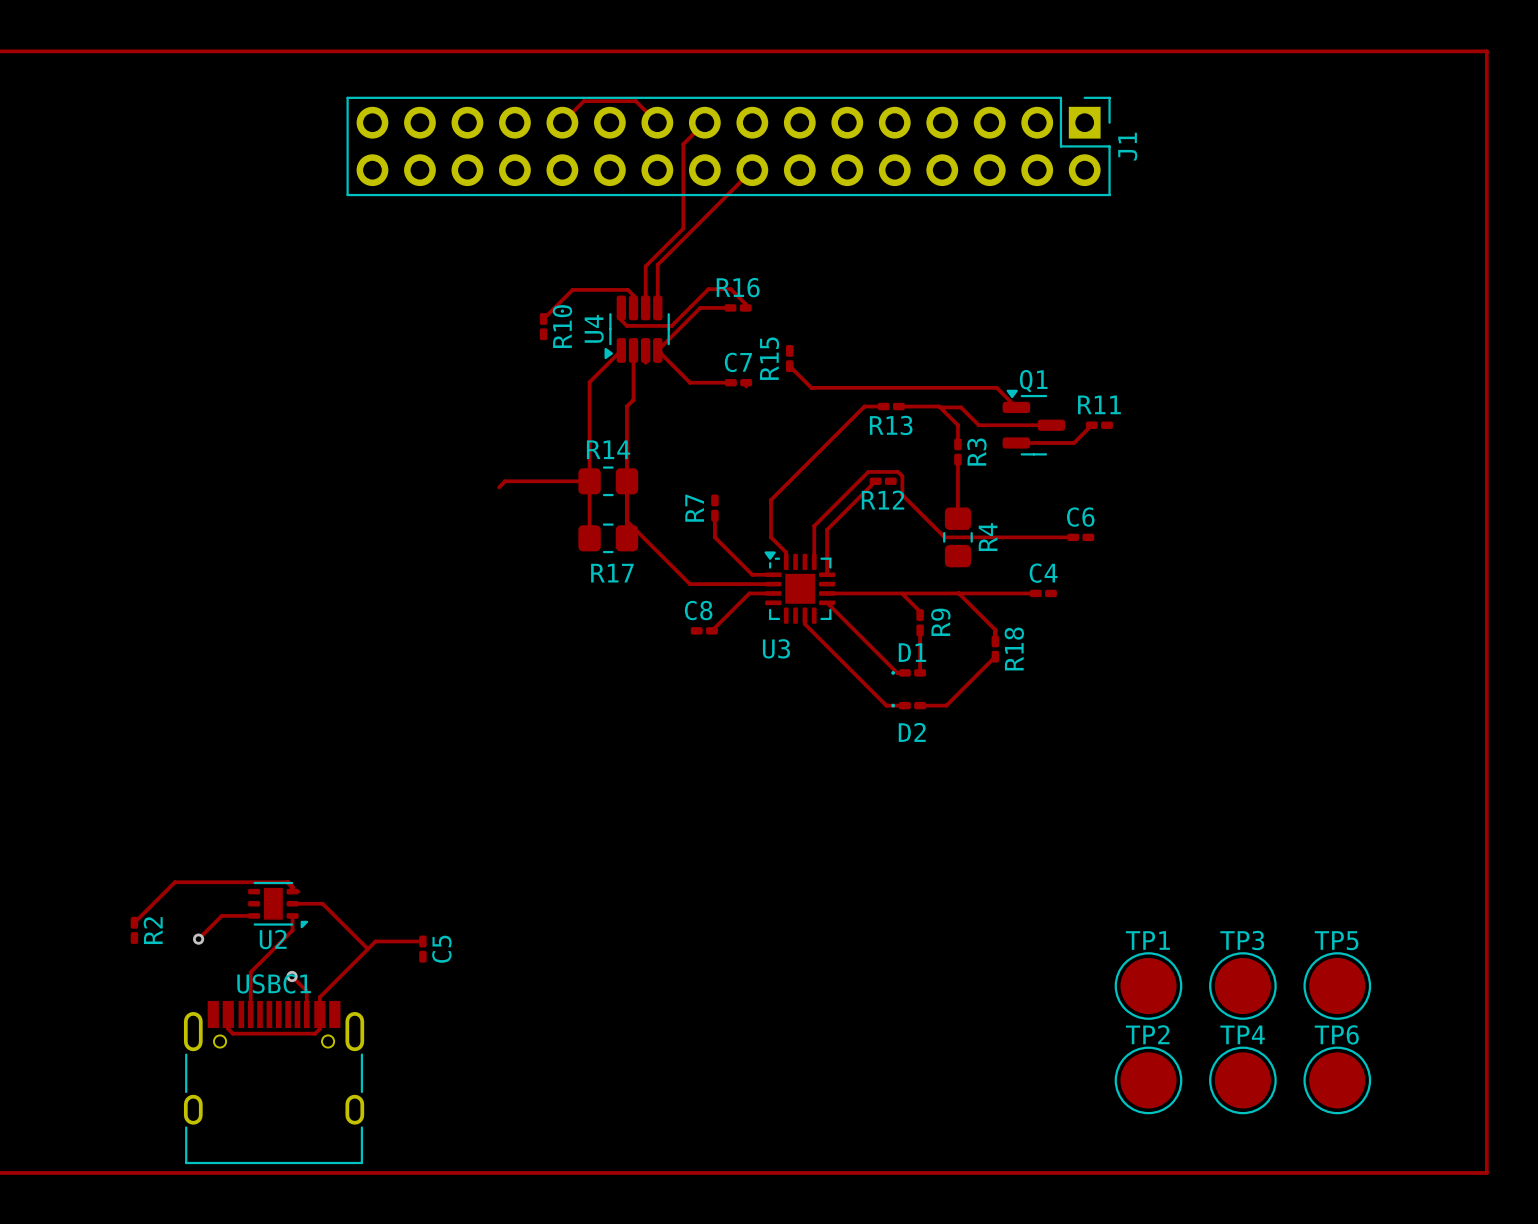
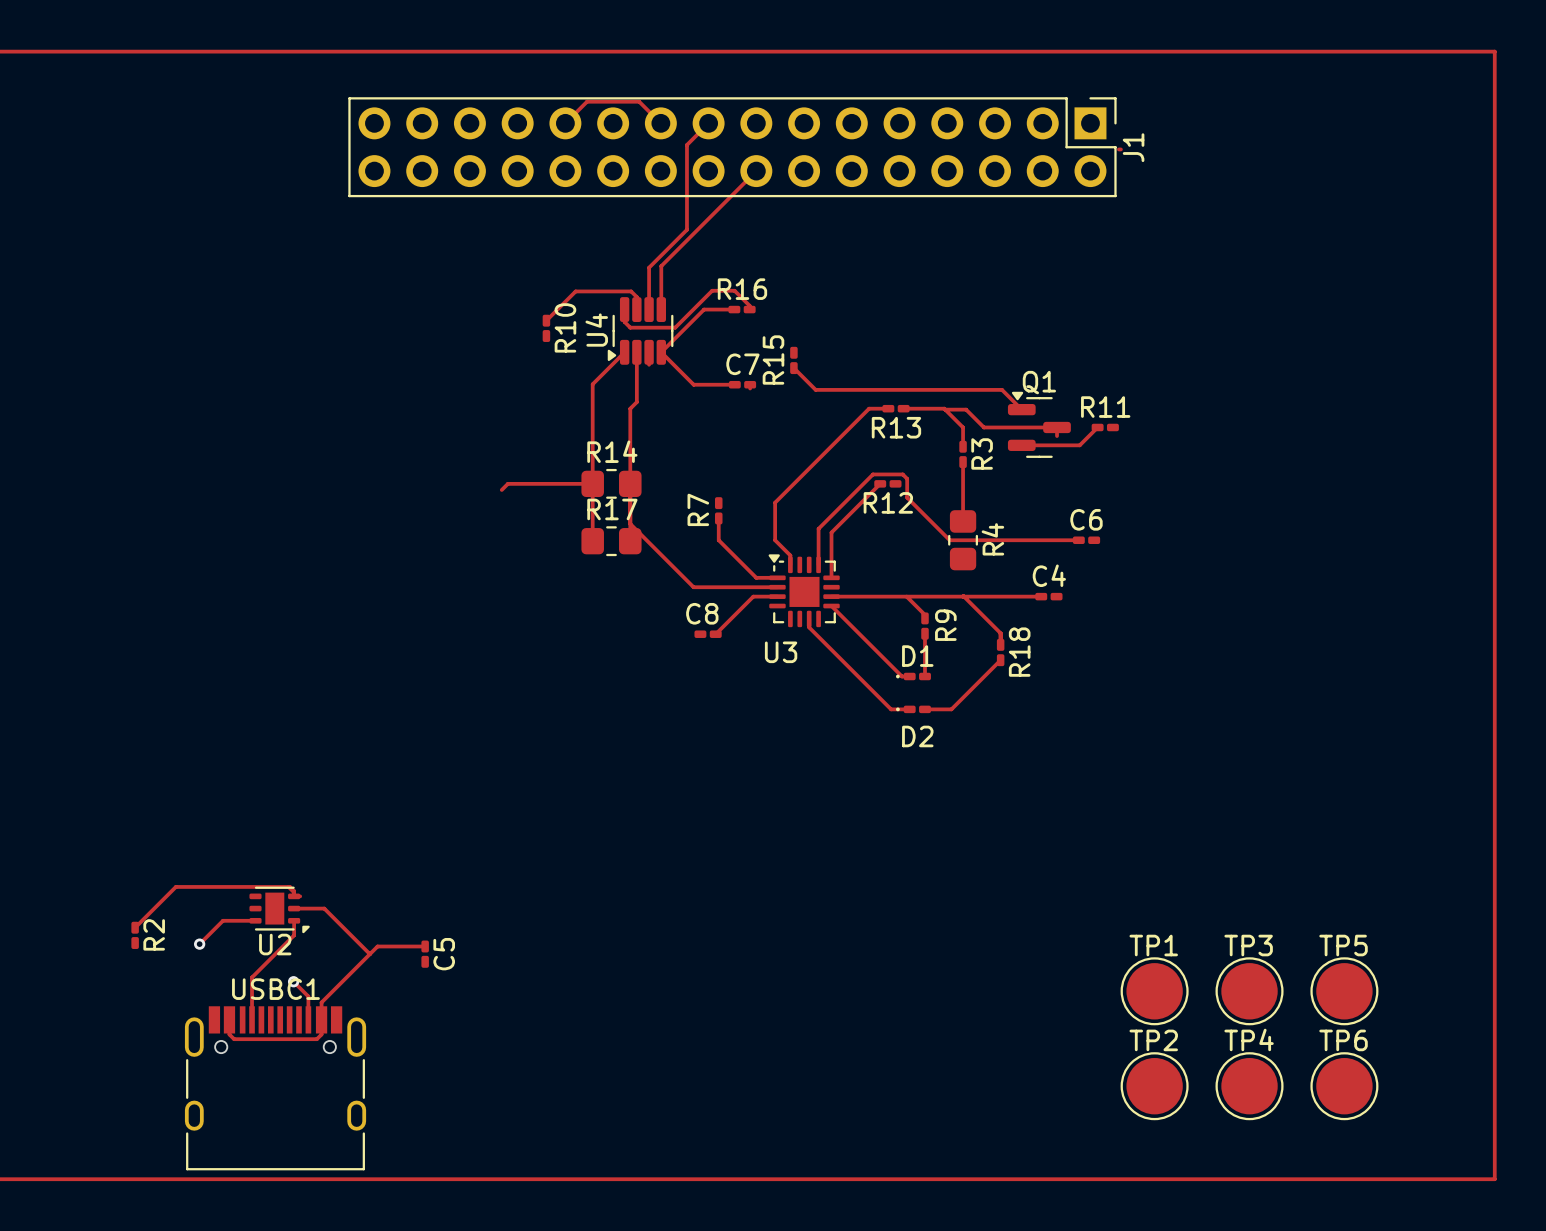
track: none -> (1118, 149) (1120, 149)
track: none -> (1057, 427) (1057, 436)
R17 name position: R17 (612, 573) -> R17 (612, 509)

